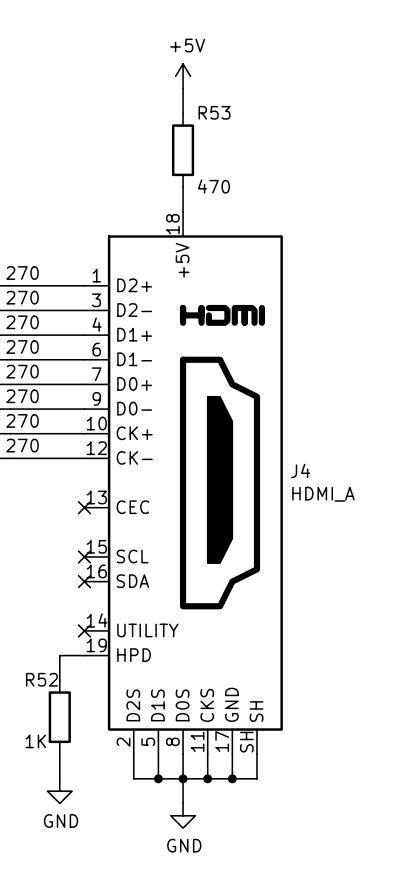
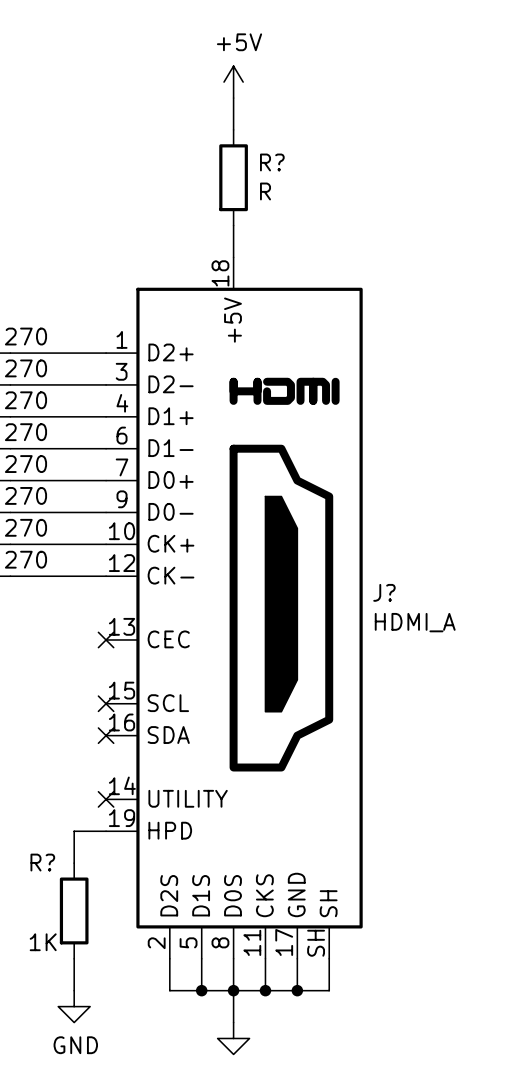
R53 name: R53 (214, 112) -> R? (272, 162)
R53 value: 470 (213, 186) -> R (265, 191)
J4 name: J4 (300, 470) -> J? (384, 592)
R52 name: R52 (41, 679) -> R? (42, 862)

